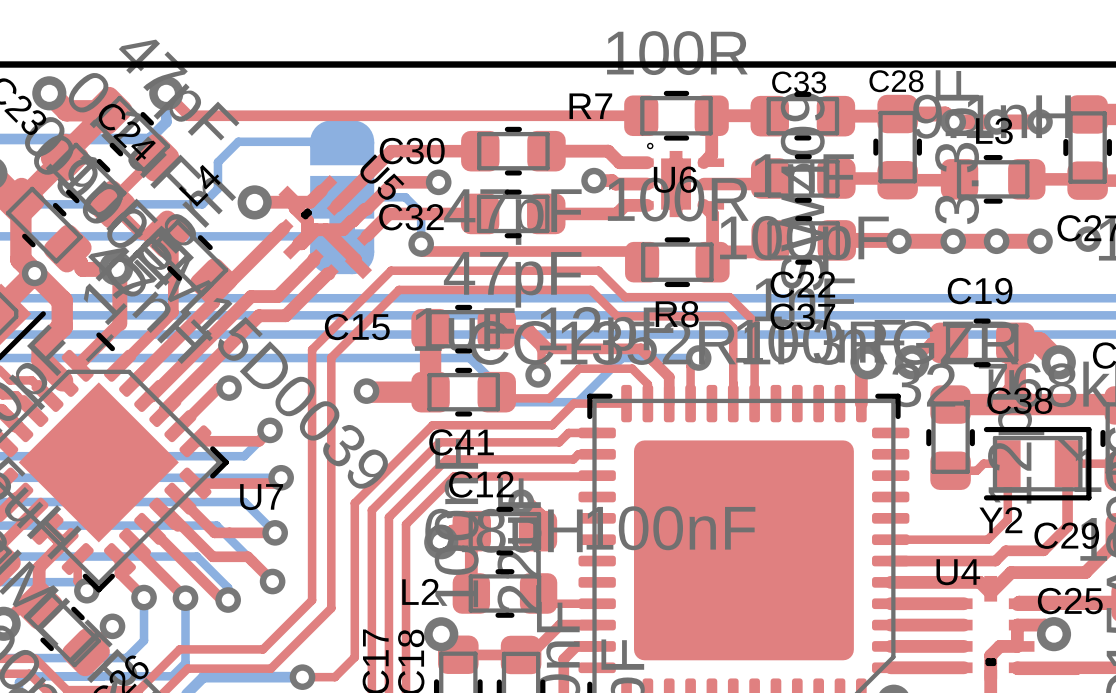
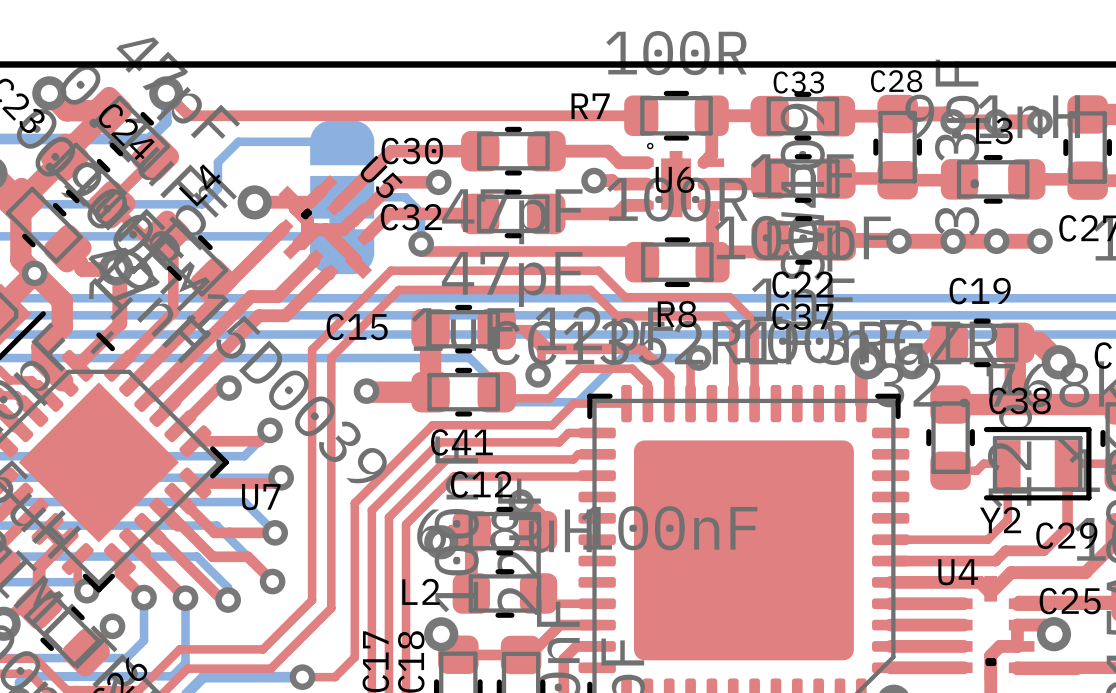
via: (1088, 239) -> none

